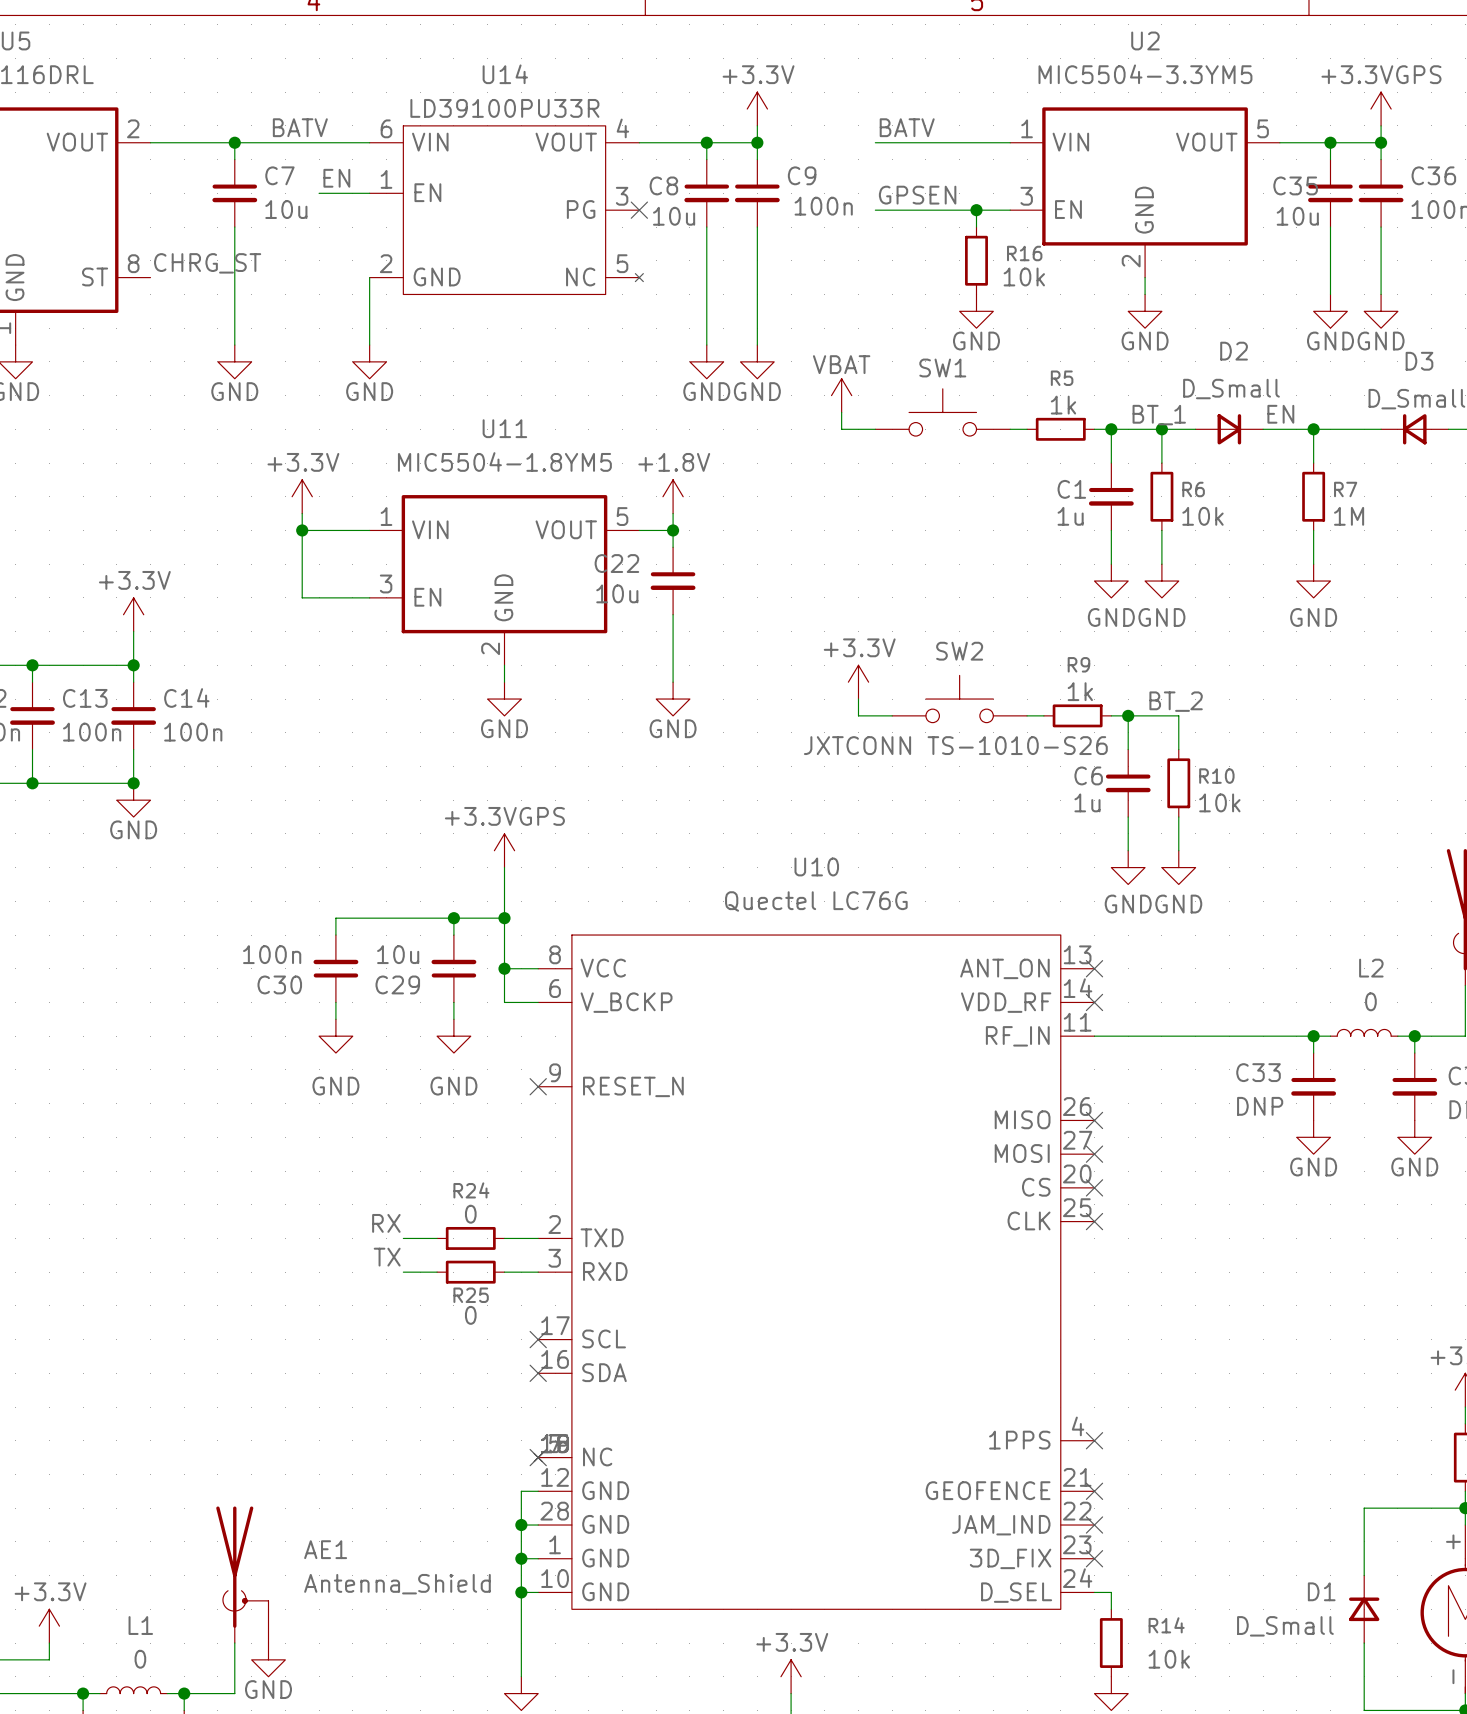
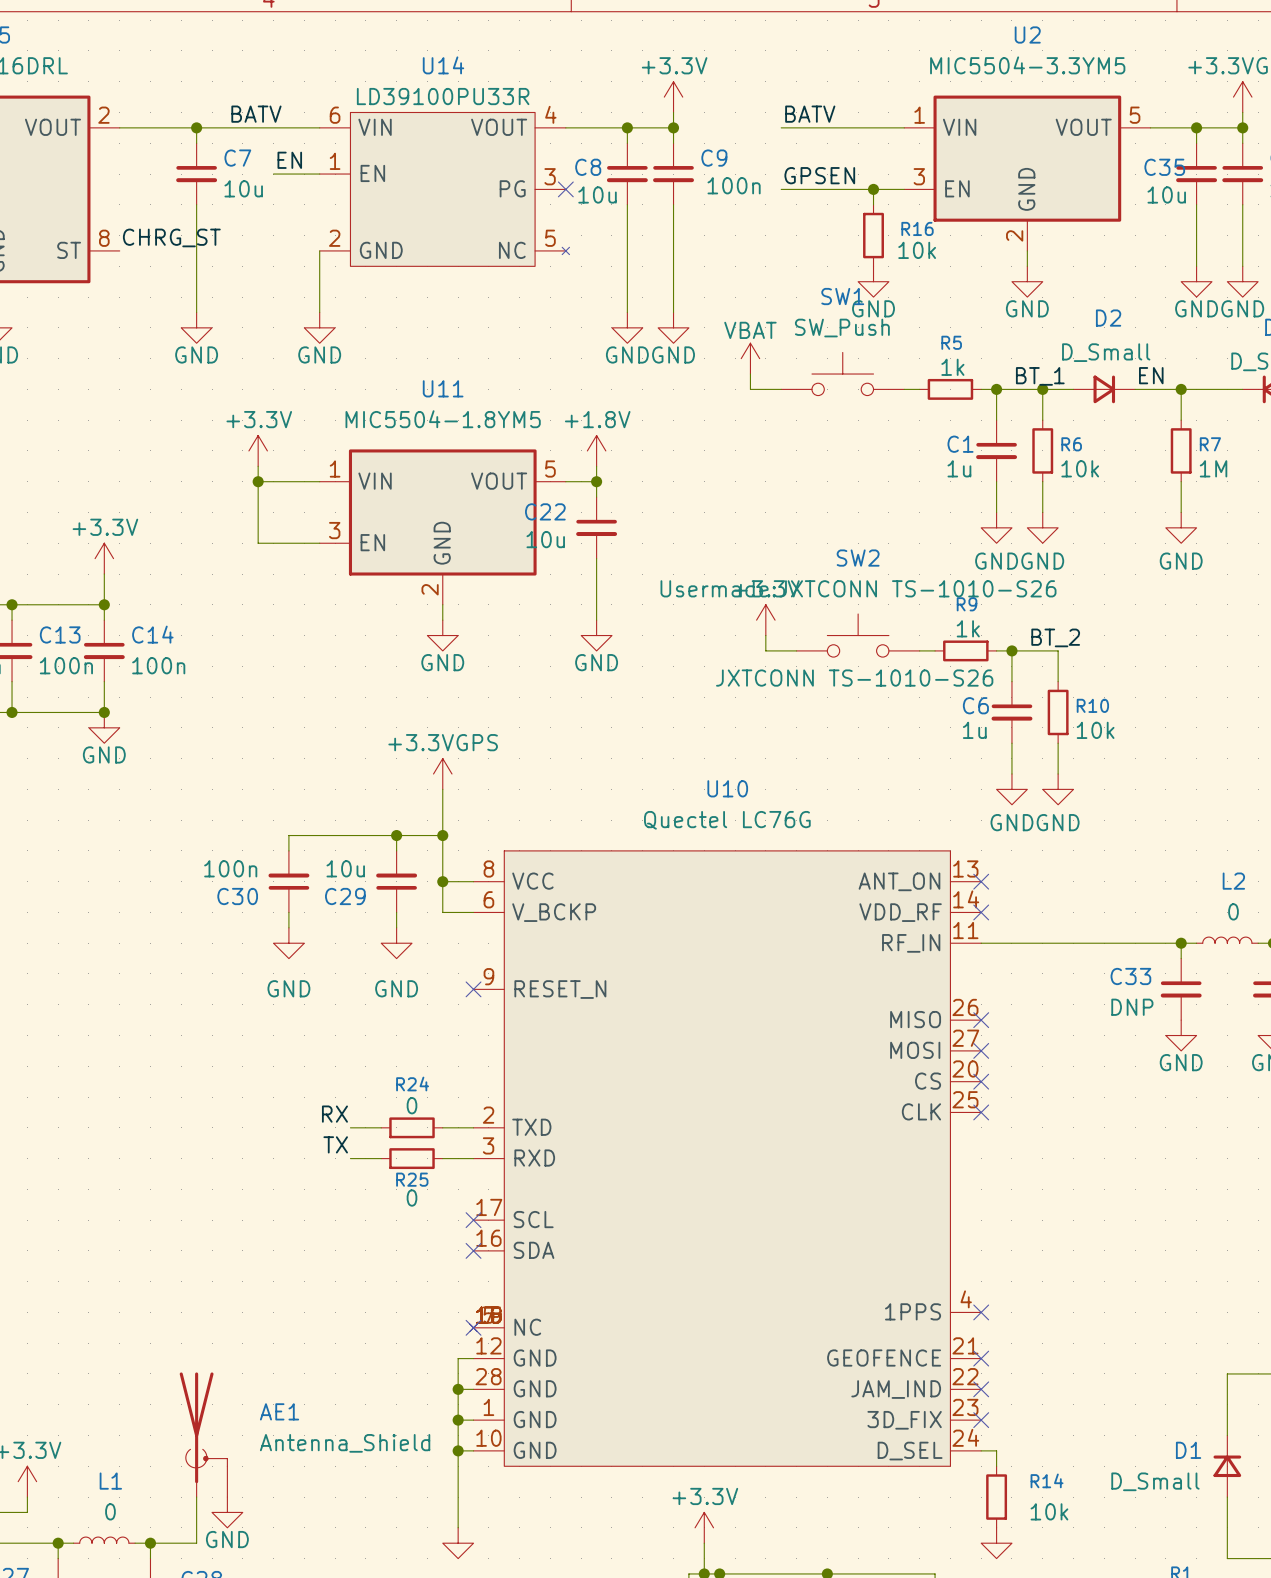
SW1 value: none -> SW_Push (842, 328)
SW1 name position: SW1 (942, 368) -> SW1 (842, 296)
SW2 text: none -> Usermade:JXTCONN TS-1010-S26 (858, 588)
SW2 name position: SW2 (959, 651) -> SW2 (858, 558)

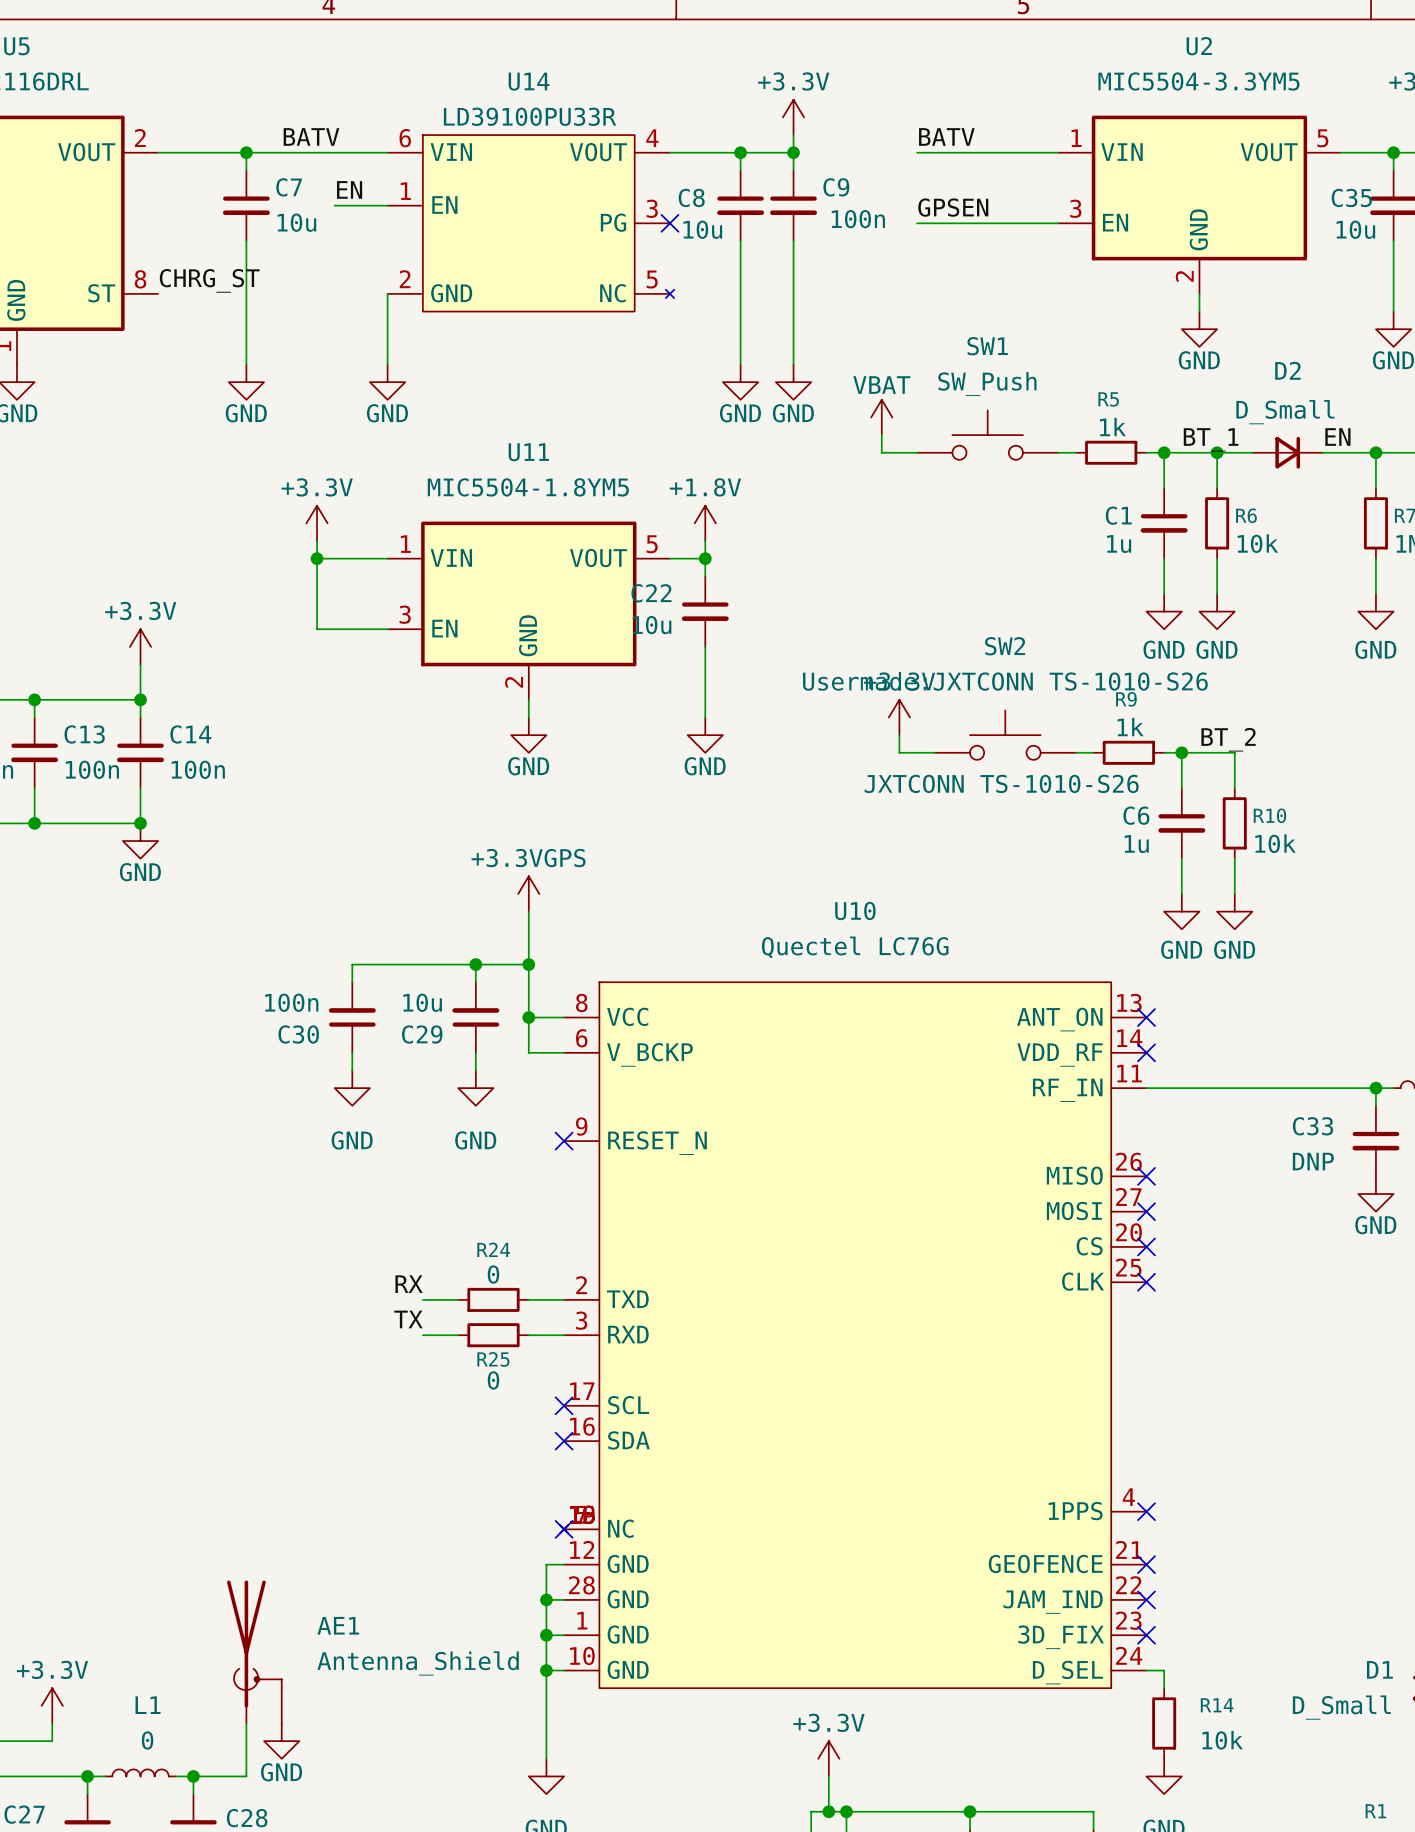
wire: (873, 189) (873, 204) -> none
junction: (873, 189) -> none
R16: 10k (873, 235) -> none
power symbol: GND (873, 281) -> none

